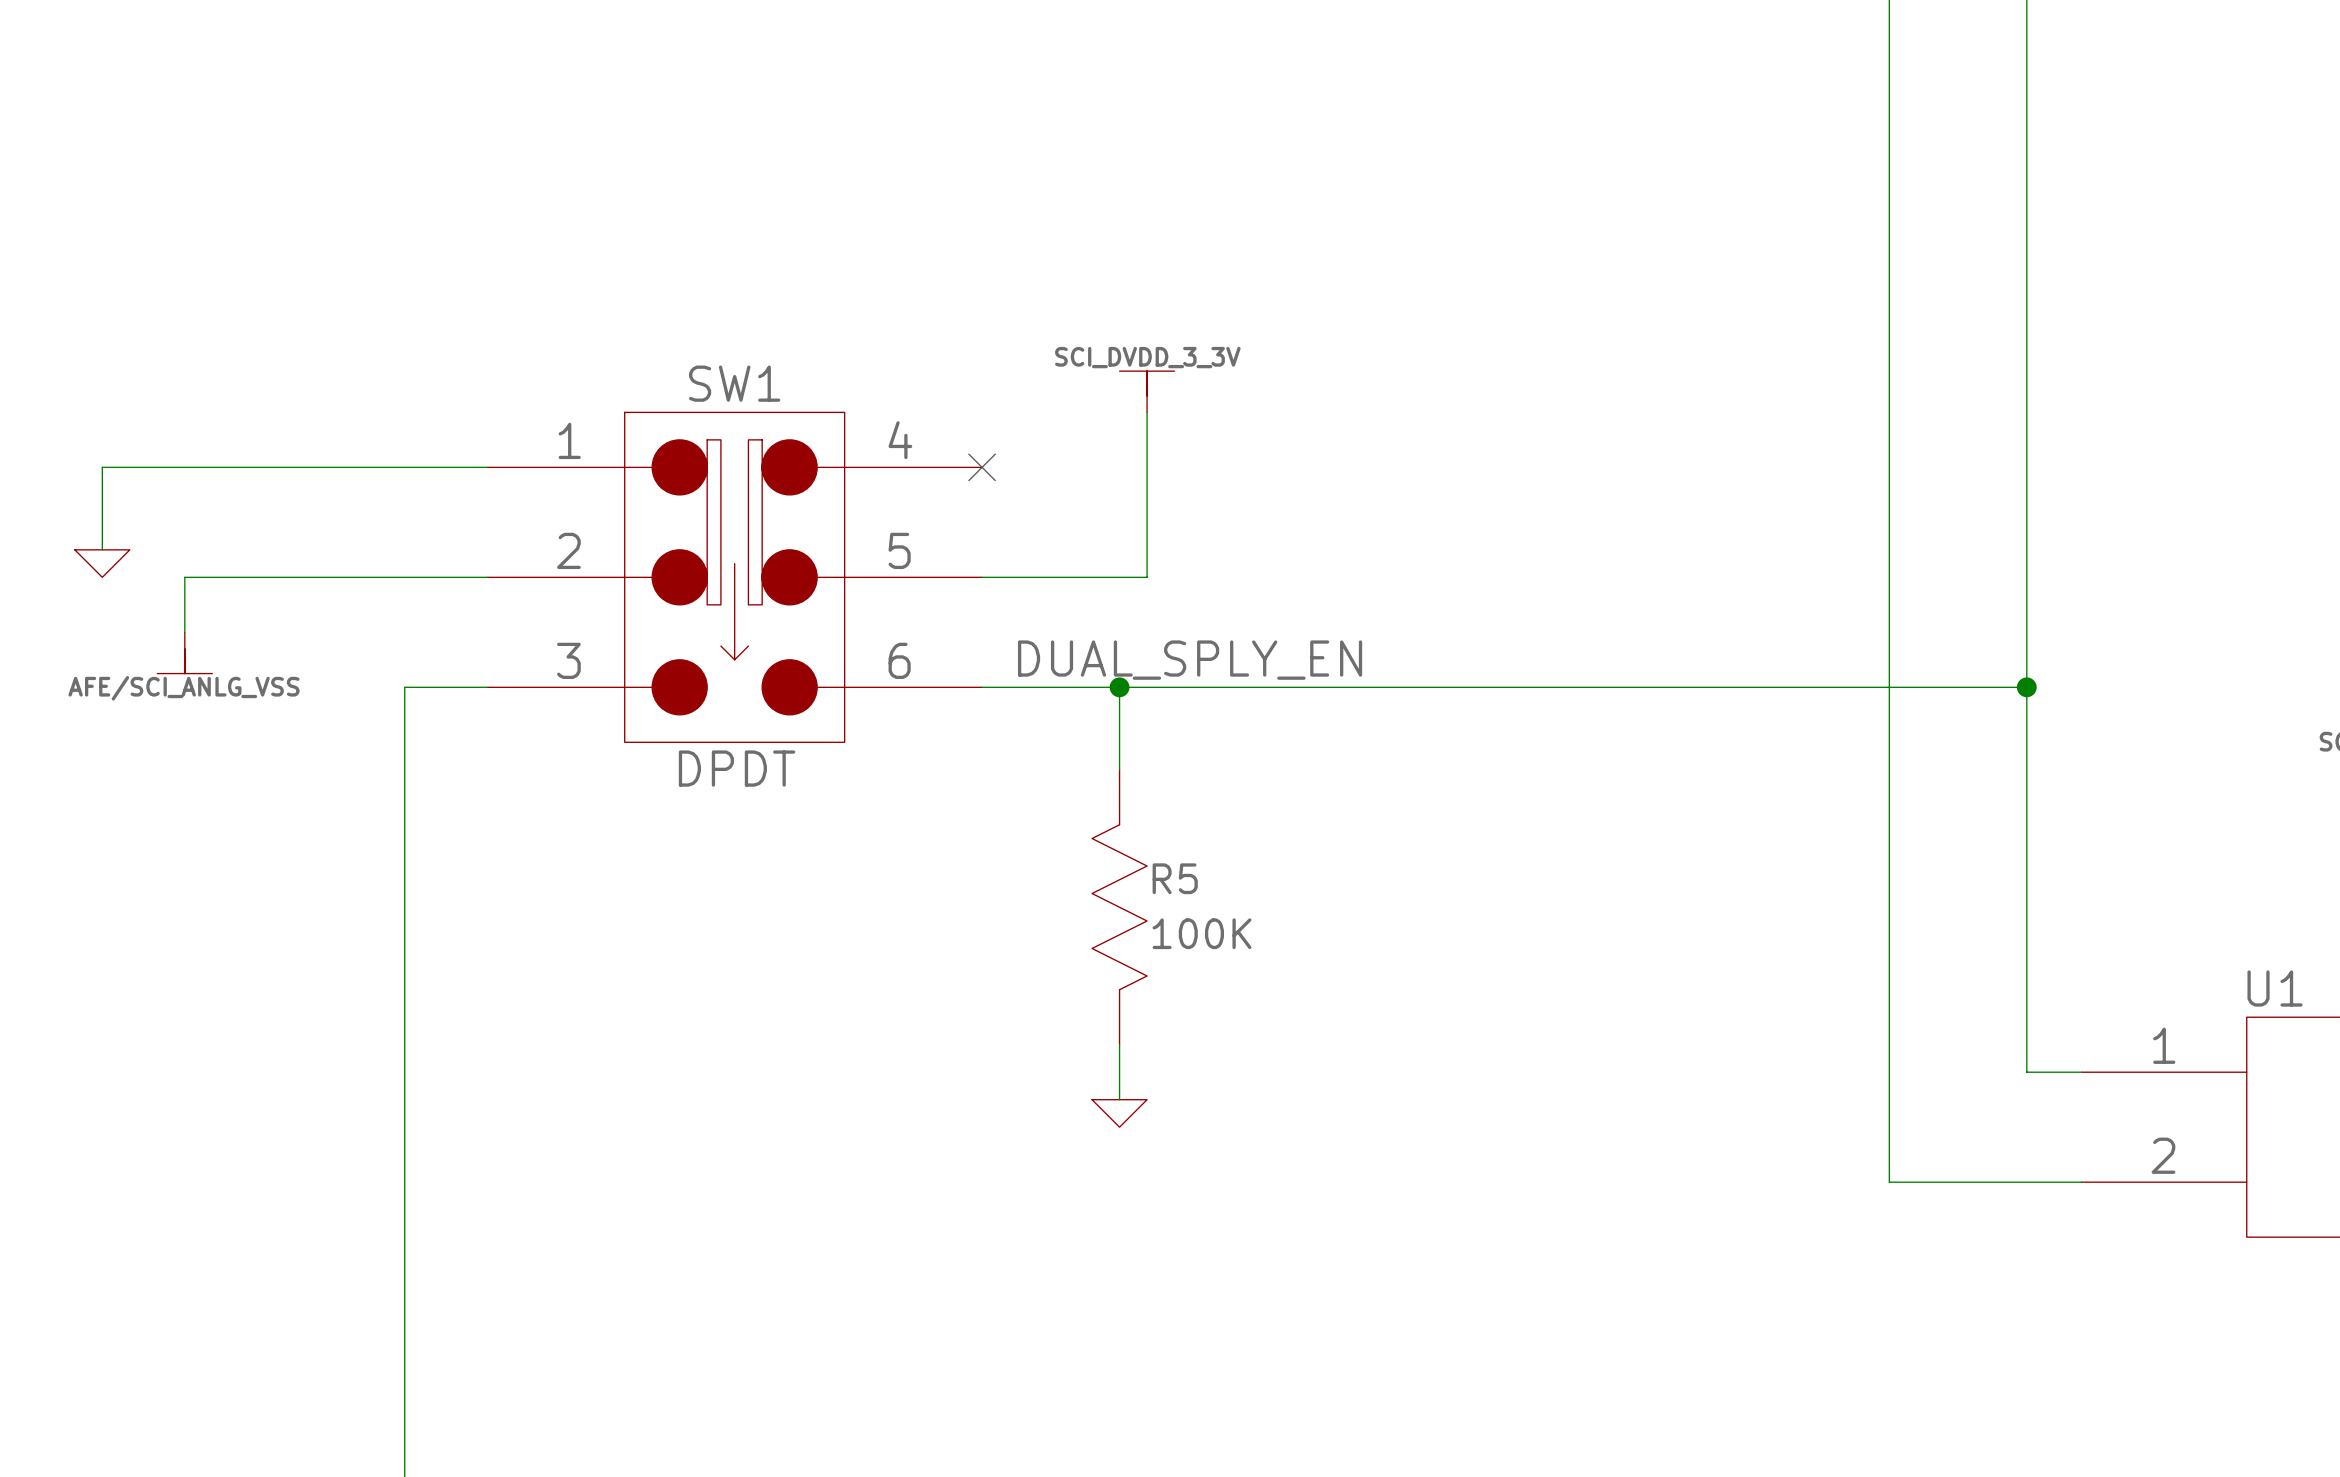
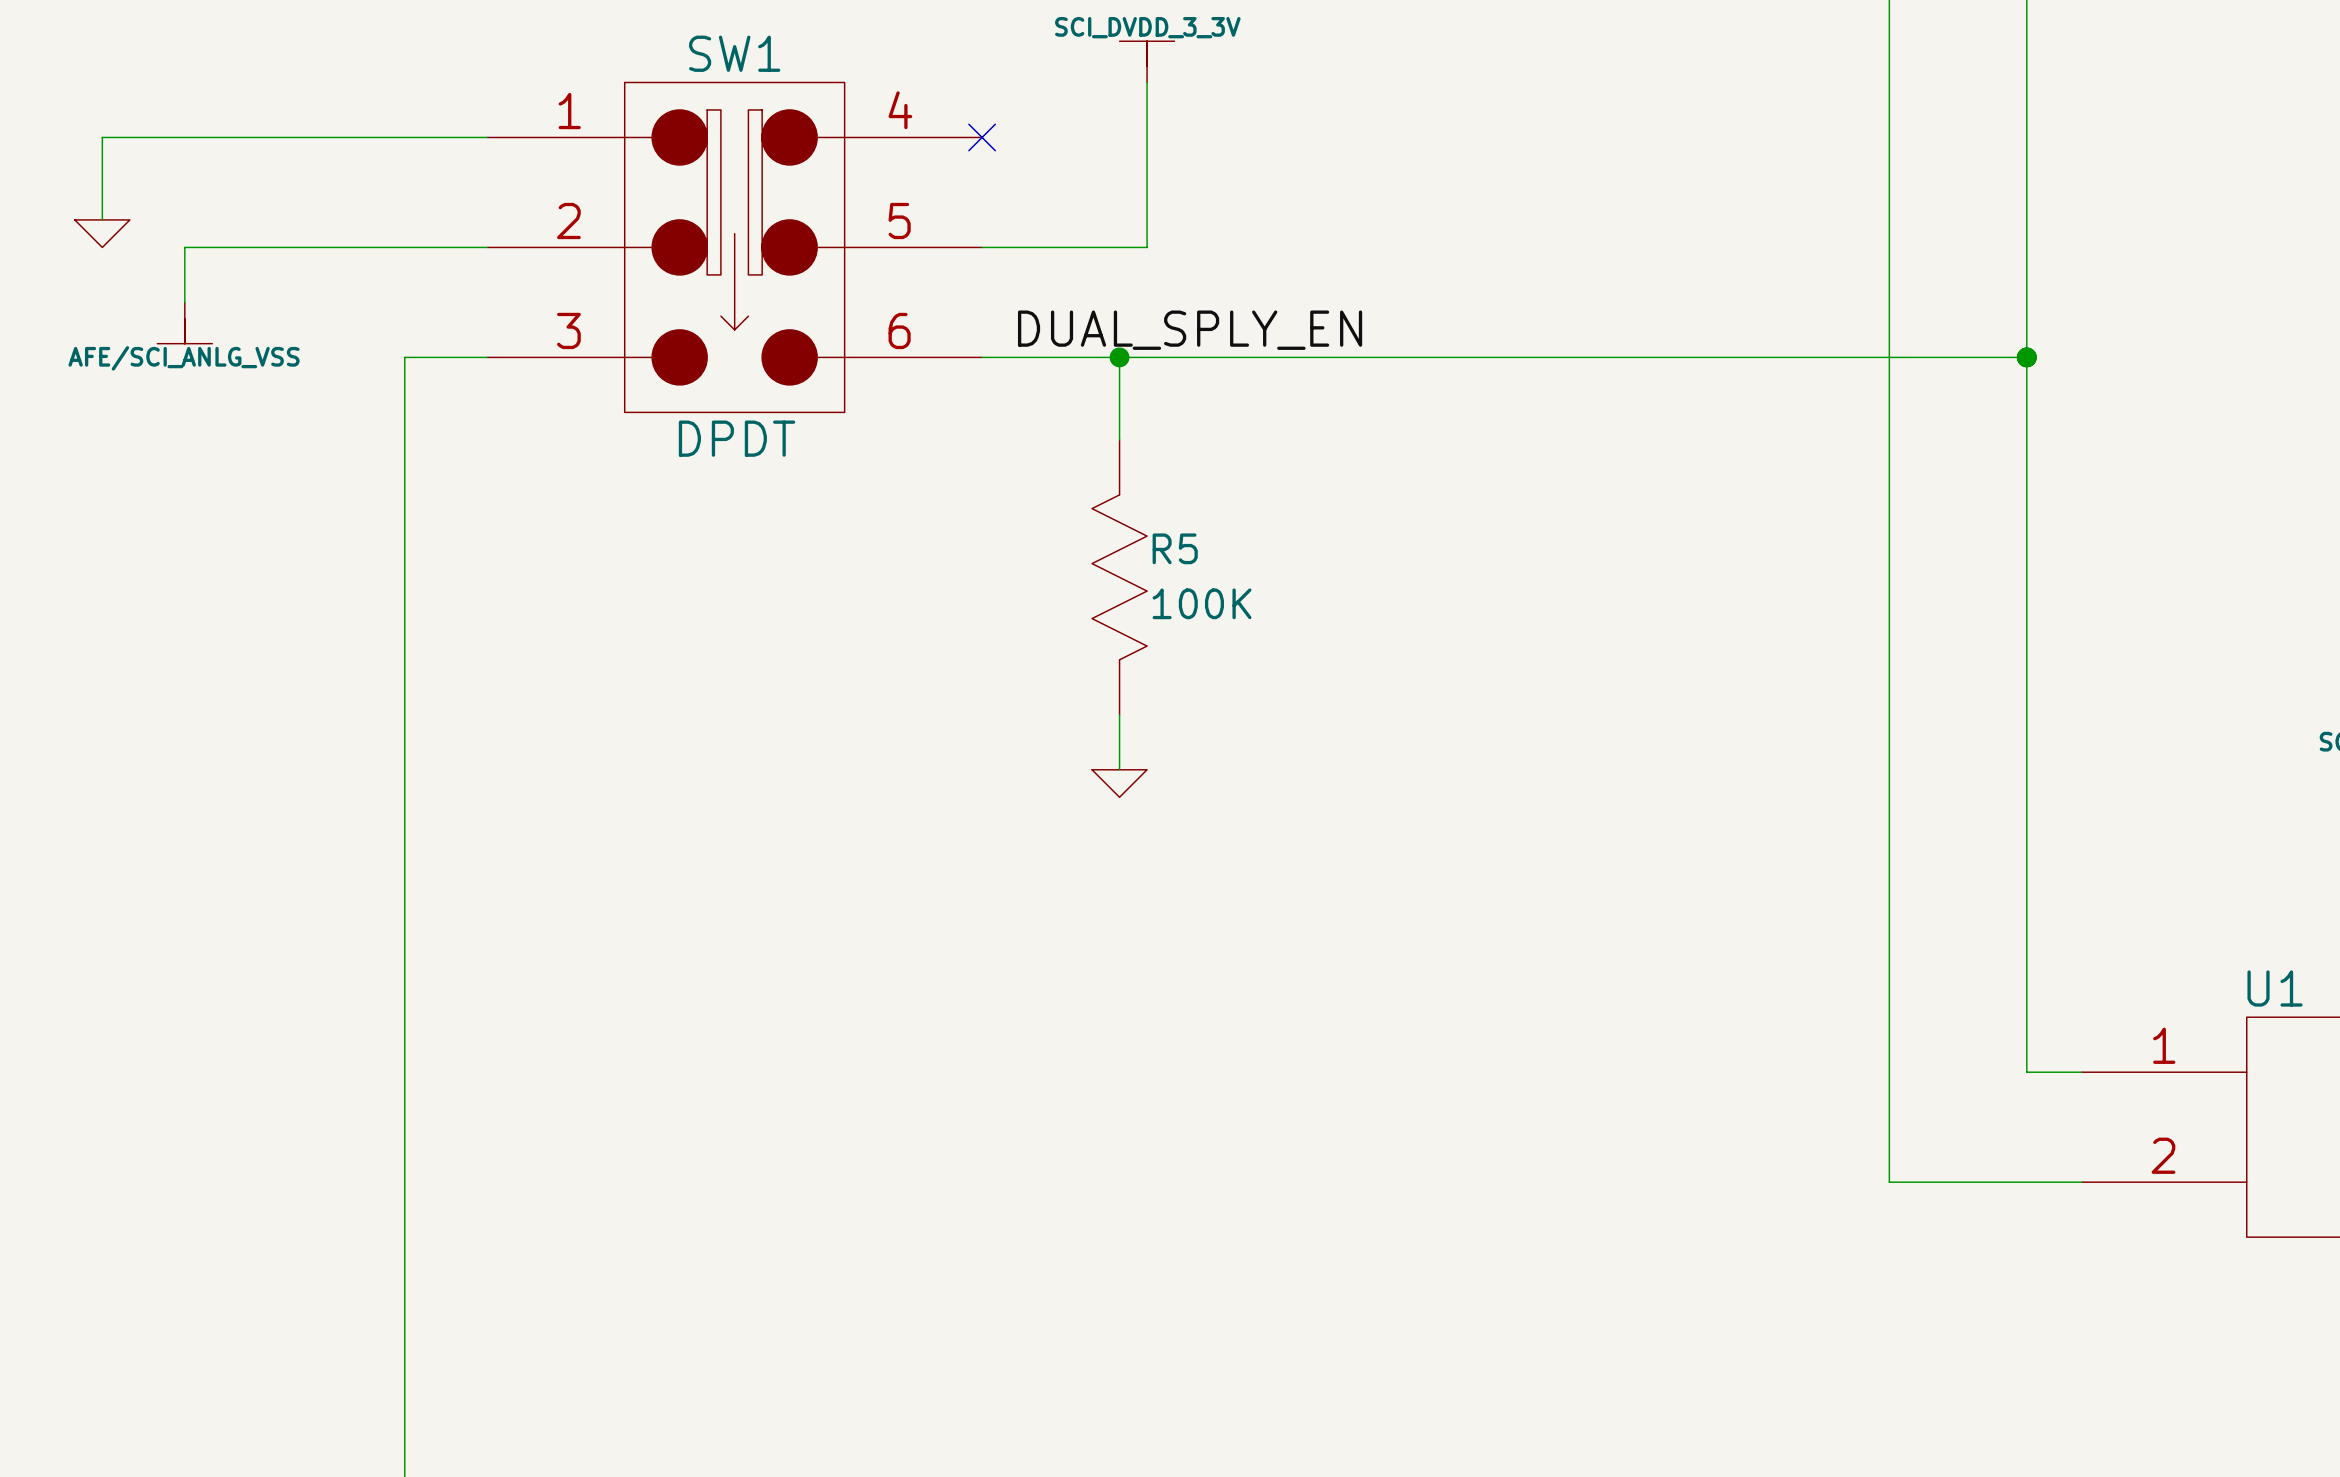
no-connect mark: none -> (982, 137)
wire: none -> (1119, 357) (1119, 439)
junction: none -> (1119, 357)
junction: none -> (2026, 357)
power symbol position: SCI_DVDD_3_3V (1147, 391) -> SCI_DVDD_3_3V (1147, 61)
wire: (1147, 412) (1147, 577) (982, 577) -> (1147, 82) (1147, 247) (982, 247)
wire: (487, 467) (102, 467) (102, 549) -> (487, 137) (102, 137) (102, 219)
no-connect mark: (982, 467) -> none
power symbol position: (102, 563) -> (102, 233)
wire: (487, 577) (184, 577) (184, 632) -> (487, 247) (184, 247) (184, 302)
SW1 position: (734, 577) -> (734, 247)
power symbol position: AFE/SCI_ANLG_VSS (184, 652) -> AFE/SCI_ANLG_VSS (184, 323)
label position: DUAL_SPLY_EN (1190, 660) -> DUAL_SPLY_EN (1190, 330)
wire: (404, 687) (487, 687) -> (404, 687) (404, 357) (487, 357)
wire: (982, 687) (2026, 687) -> (982, 357) (2026, 357)
junction: (1119, 687) -> none
junction: (2026, 687) -> none
R5 position: (1119, 907) -> (1119, 577)
wire: (1119, 1044) (1119, 1099) -> none
power symbol position: (1119, 1113) -> (1119, 783)

